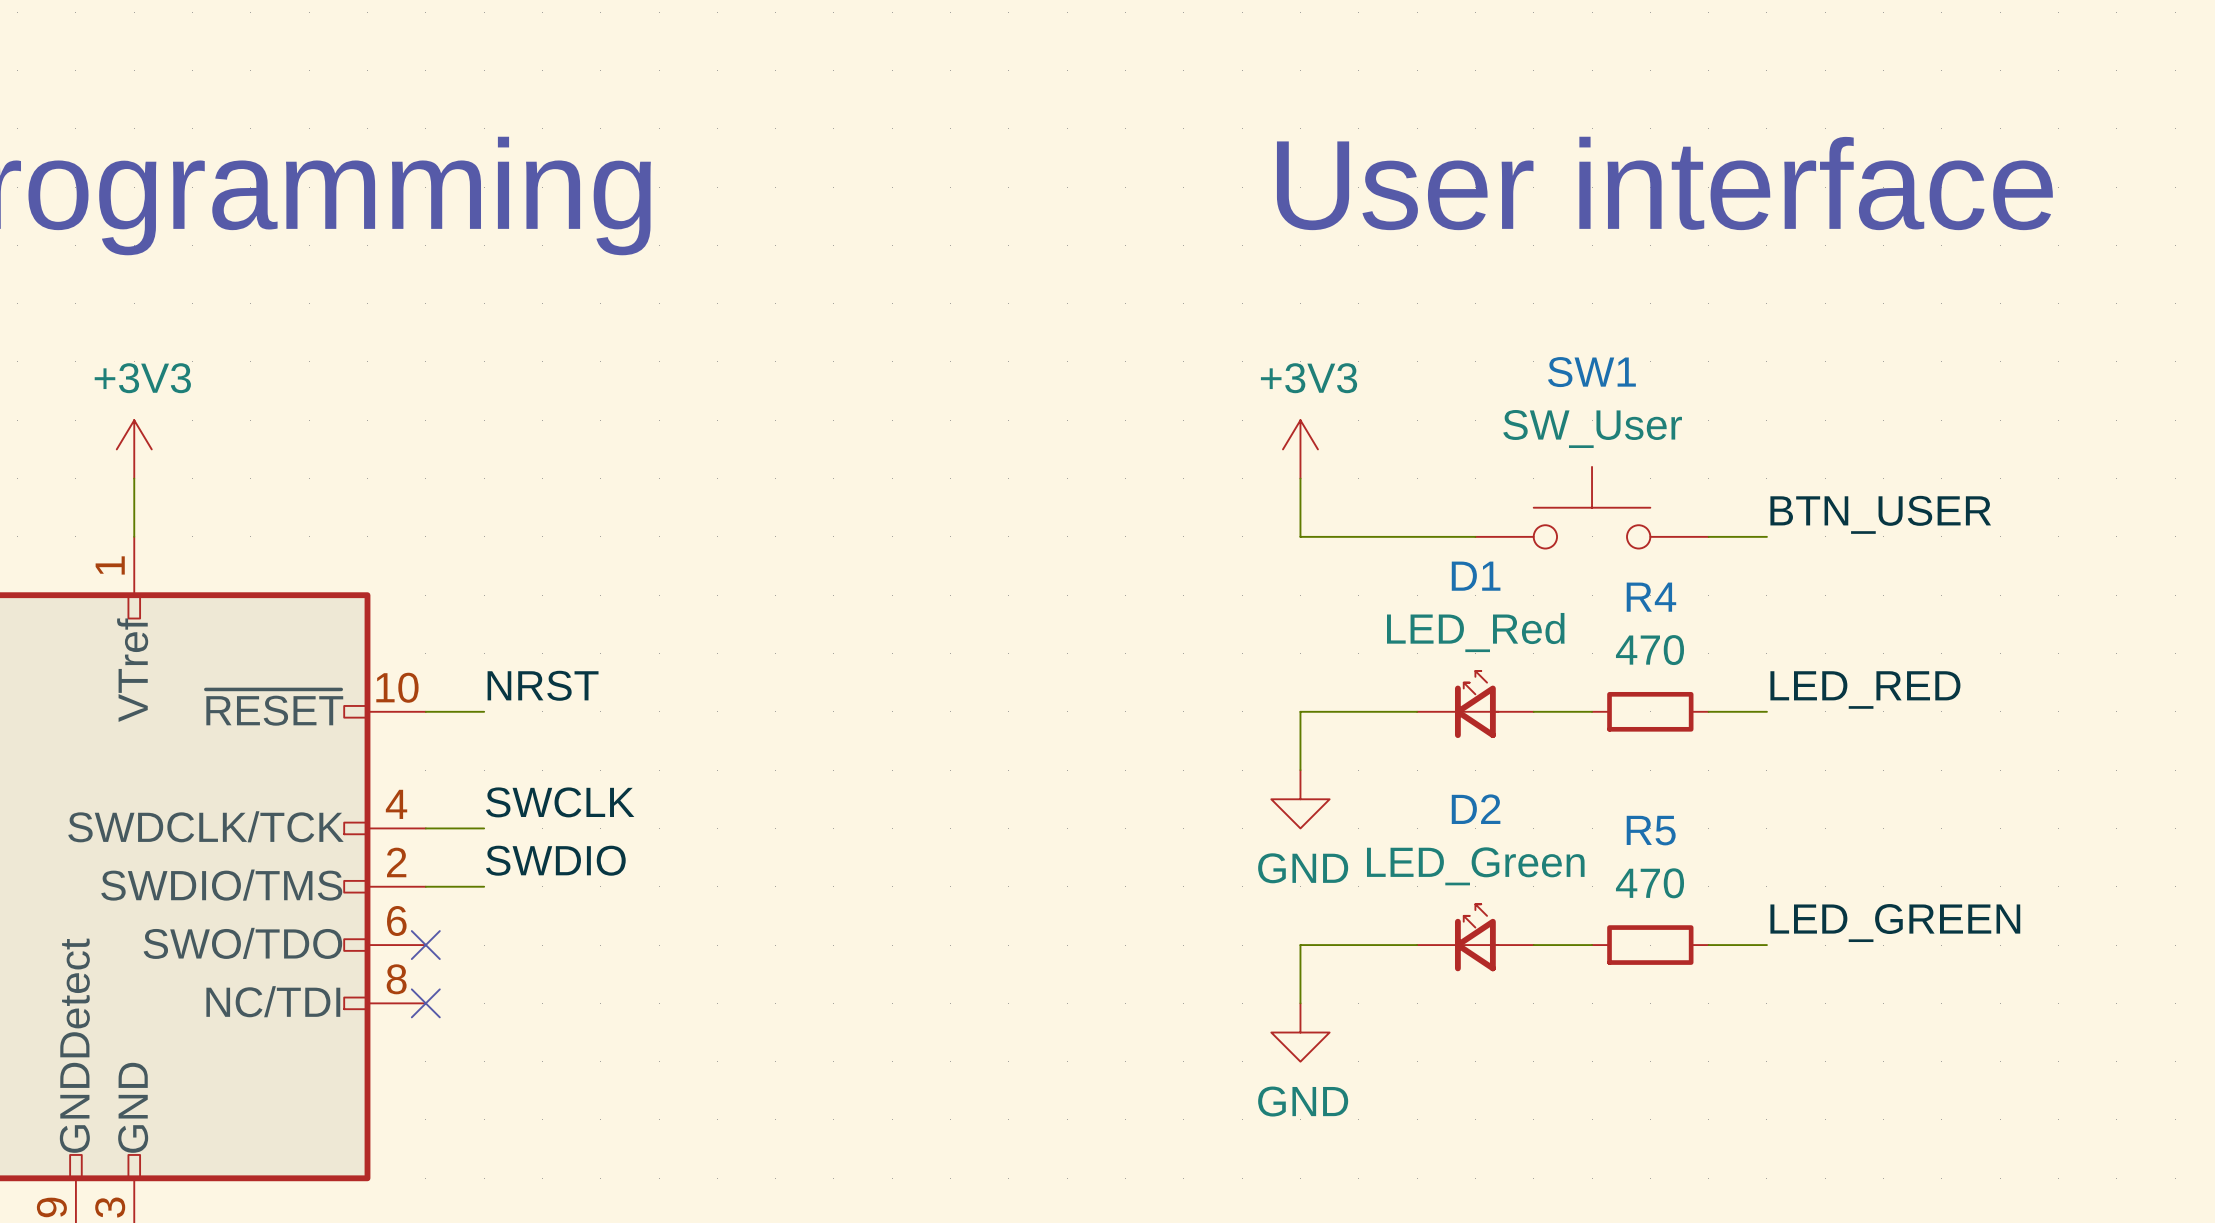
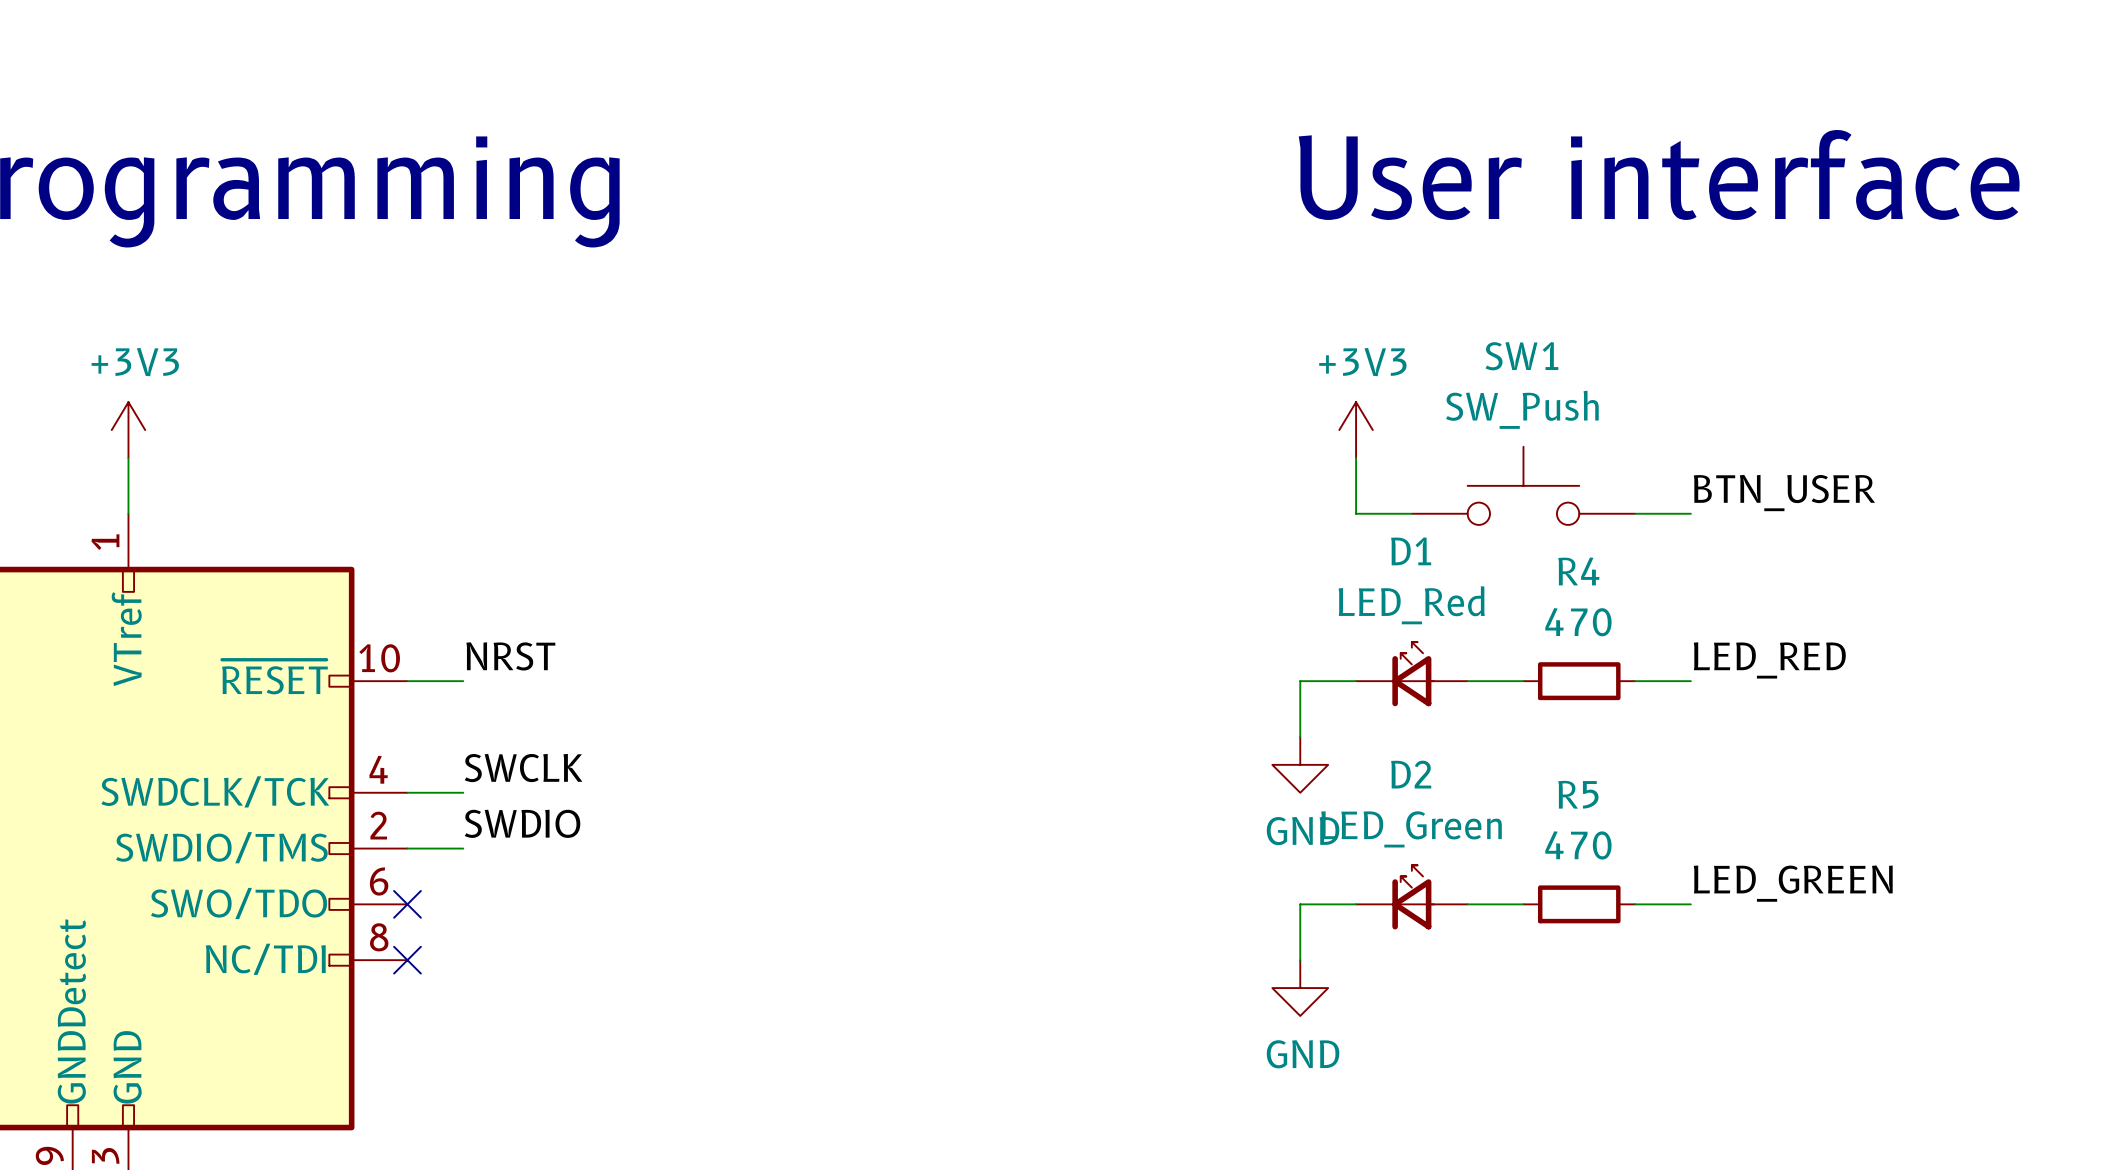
text position: User interface (1664, 183) -> User interface (1659, 174)
SW1 value: SW_User (1592, 428) -> SW_Push (1522, 409)
power symbol position: +3V3 (1300, 449) -> +3V3 (1356, 430)
wire: (1300, 478) (1300, 536) (1417, 536) -> (1356, 457) (1356, 513)
wire: (1358, 711) (1300, 711) (1300, 770) -> (1300, 681) (1300, 736)
power symbol position: GND (1300, 799) -> GND (1300, 764)
wire: (1358, 945) (1300, 945) (1300, 1003) -> (1300, 904) (1300, 960)
power symbol position: GND (1300, 1032) -> GND (1300, 988)

